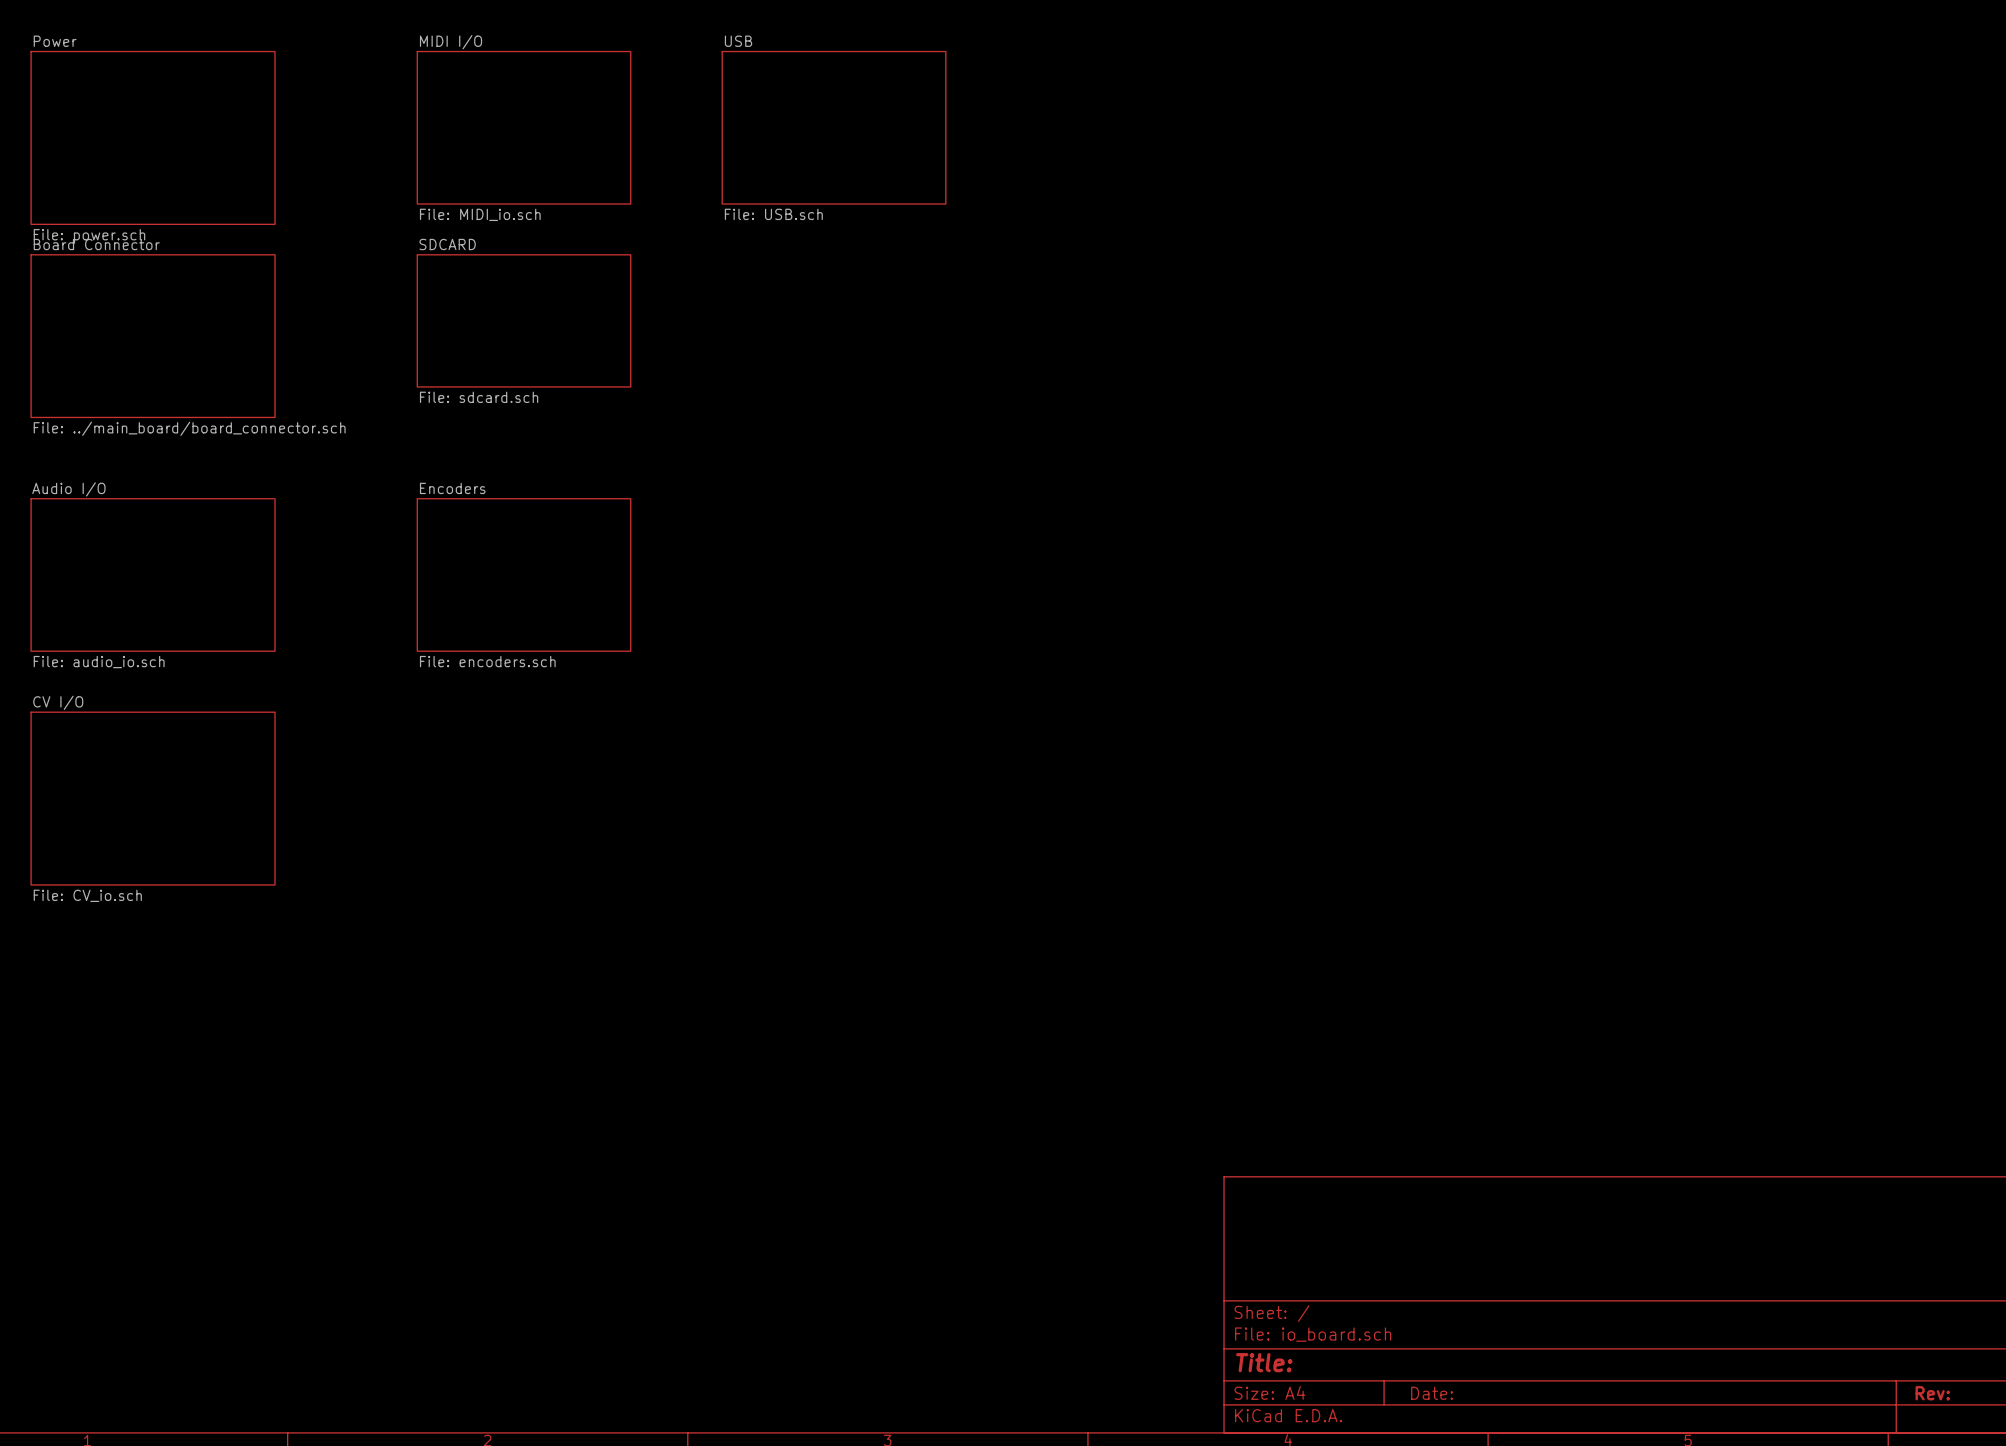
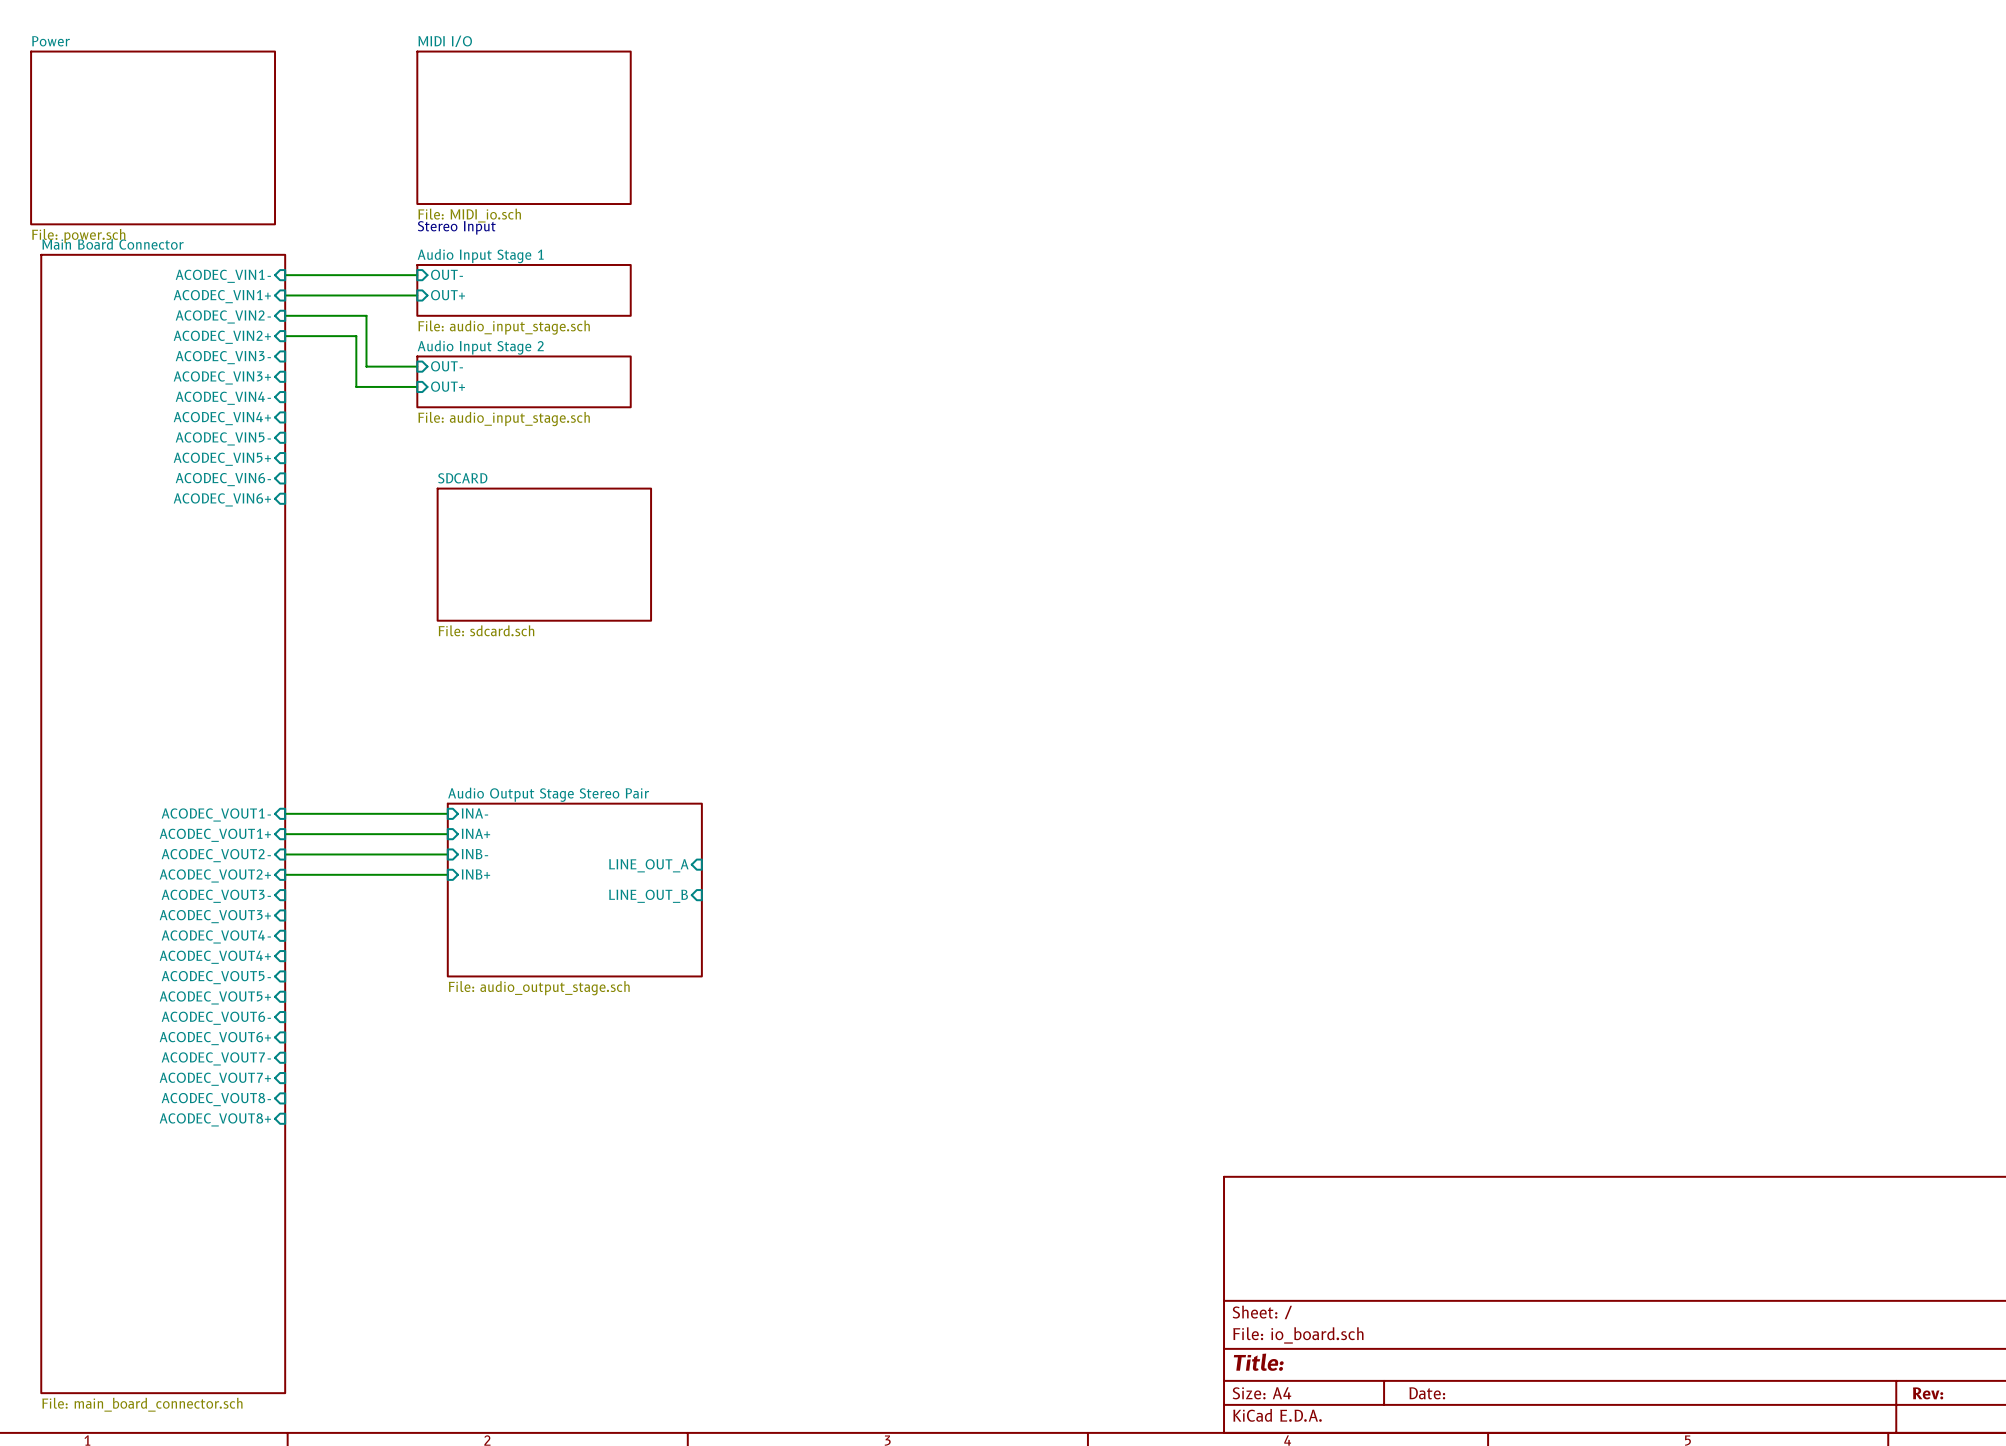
sheet USB: File: USB.sch (834, 127) -> none
text: none -> Stereo Input (456, 227)
sheet pin: none -> OUT- (447, 274)
sheet pin: none -> ACODEC_VIN1- (223, 276)
wire: none -> (285, 275) (417, 275)
sheet Audio Input Stage 1: none -> File: audio_input_stage.sch (524, 290)
sheet pin: none -> ACODEC_VIN1+ (222, 296)
wire: none -> (285, 295) (417, 295)
sheet pin: none -> OUT+ (448, 295)
sheet pin: none -> ACODEC_VIN2- (223, 316)
wire: none -> (285, 315) (366, 315) (366, 366) (417, 366)
sheet SDCARD: File: sdcard.sch (524, 320) -> none
sheet Board Connector: File: ../main_board/board_connector.sch (153, 336) -> none
sheet pin: none -> ACODEC_VIN2+ (222, 337)
wire: none -> (285, 336) (356, 336) (356, 386) (417, 386)
sheet pin: none -> ACODEC_VIN3- (223, 357)
sheet pin: none -> OUT- (447, 366)
sheet pin: none -> ACODEC_VIN3+ (222, 377)
sheet Audio Input Stage 2: none -> File: audio_input_stage.sch (524, 381)
sheet pin: none -> OUT+ (448, 386)
sheet pin: none -> ACODEC_VIN4- (223, 398)
sheet pin: none -> ACODEC_VIN4+ (222, 418)
sheet pin: none -> ACODEC_VIN5- (223, 438)
sheet pin: none -> ACODEC_VIN5+ (222, 459)
sheet pin: none -> ACODEC_VIN6- (223, 479)
sheet pin: none -> ACODEC_VIN6+ (222, 499)
sheet SDCARD: none -> File: sdcard.sch (544, 554)
sheet Audio I/O: File: audio_io.sch (153, 574) -> none
sheet Encoders: File: encoders.sch (524, 574) -> none
sheet CV I/O: File: CV_io.sch (153, 798) -> none
sheet pin: none -> ACODEC_VOUT1- (216, 814)
wire: none -> (285, 813) (447, 813)
sheet pin: none -> INA- (474, 813)
sheet Main Board Connector: none -> File: main_board_connector.sch (163, 823)
sheet pin: none -> INA+ (475, 833)
sheet pin: none -> ACODEC_VOUT1+ (215, 835)
wire: none -> (285, 834) (447, 834)
sheet pin: none -> ACODEC_VOUT2- (216, 855)
wire: none -> (285, 854) (447, 854)
sheet pin: none -> INB- (474, 854)
sheet pin: none -> LINE_OUT_A (648, 865)
sheet pin: none -> ACODEC_VOUT2+ (215, 875)
wire: none -> (285, 874) (447, 874)
sheet pin: none -> INB+ (475, 874)
sheet Audio Output Stage Stereo Pair: none -> File: audio_output_stage.sch (574, 890)
sheet pin: none -> ACODEC_VOUT3- (216, 896)
sheet pin: none -> LINE_OUT_B (648, 896)
sheet pin: none -> ACODEC_VOUT3+ (215, 916)
sheet pin: none -> ACODEC_VOUT4- (216, 936)
sheet pin: none -> ACODEC_VOUT4+ (215, 957)
sheet pin: none -> ACODEC_VOUT5- (216, 977)
sheet pin: none -> ACODEC_VOUT5+ (215, 997)
sheet pin: none -> ACODEC_VOUT6- (216, 1018)
sheet pin: none -> ACODEC_VOUT6+ (215, 1038)
sheet pin: none -> ACODEC_VOUT7- (216, 1058)
sheet pin: none -> ACODEC_VOUT7+ (215, 1079)
sheet pin: none -> ACODEC_VOUT8- (216, 1099)
sheet pin: none -> ACODEC_VOUT8+ (215, 1119)

